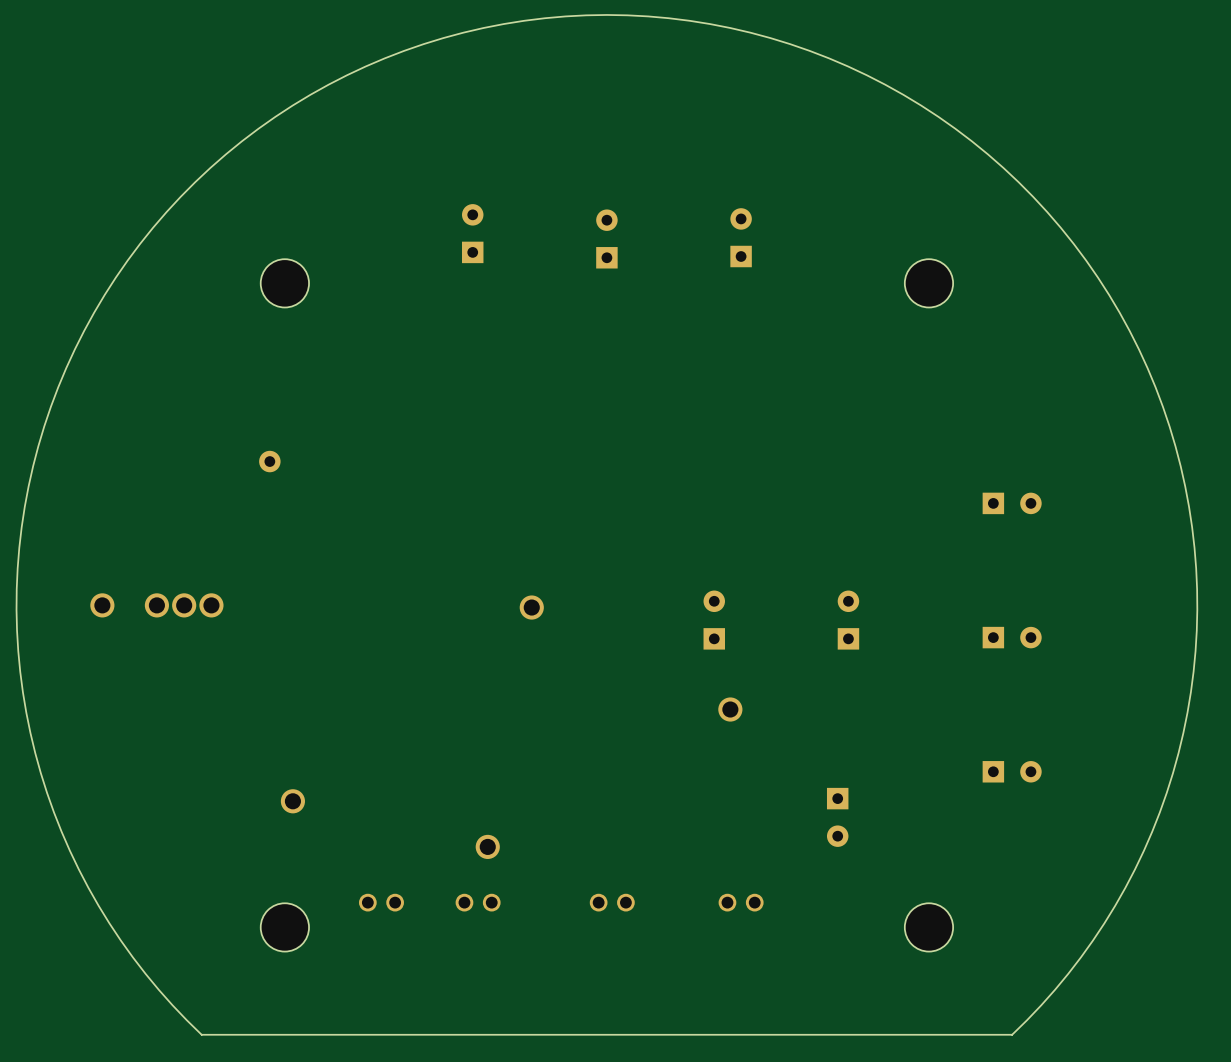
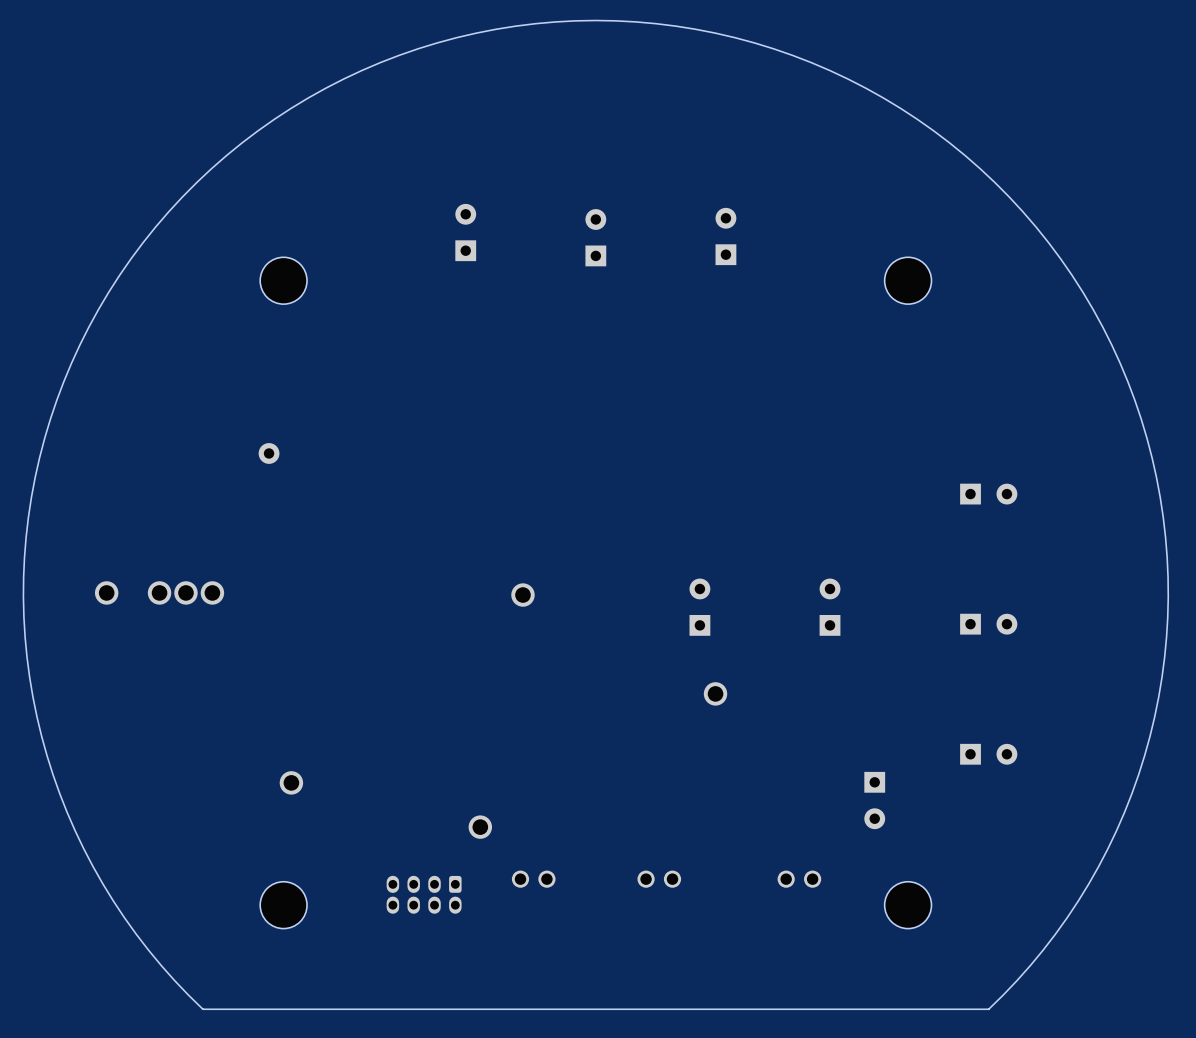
part position: (837, 817) -> (874, 800)
part: none -> (533, 879)
part: none -> (659, 879)
part: none -> (799, 879)
part: (381, 902) -> none
part: (478, 902) -> none
part: (612, 902) -> none
part: (741, 902) -> none
part: none -> (424, 894)

